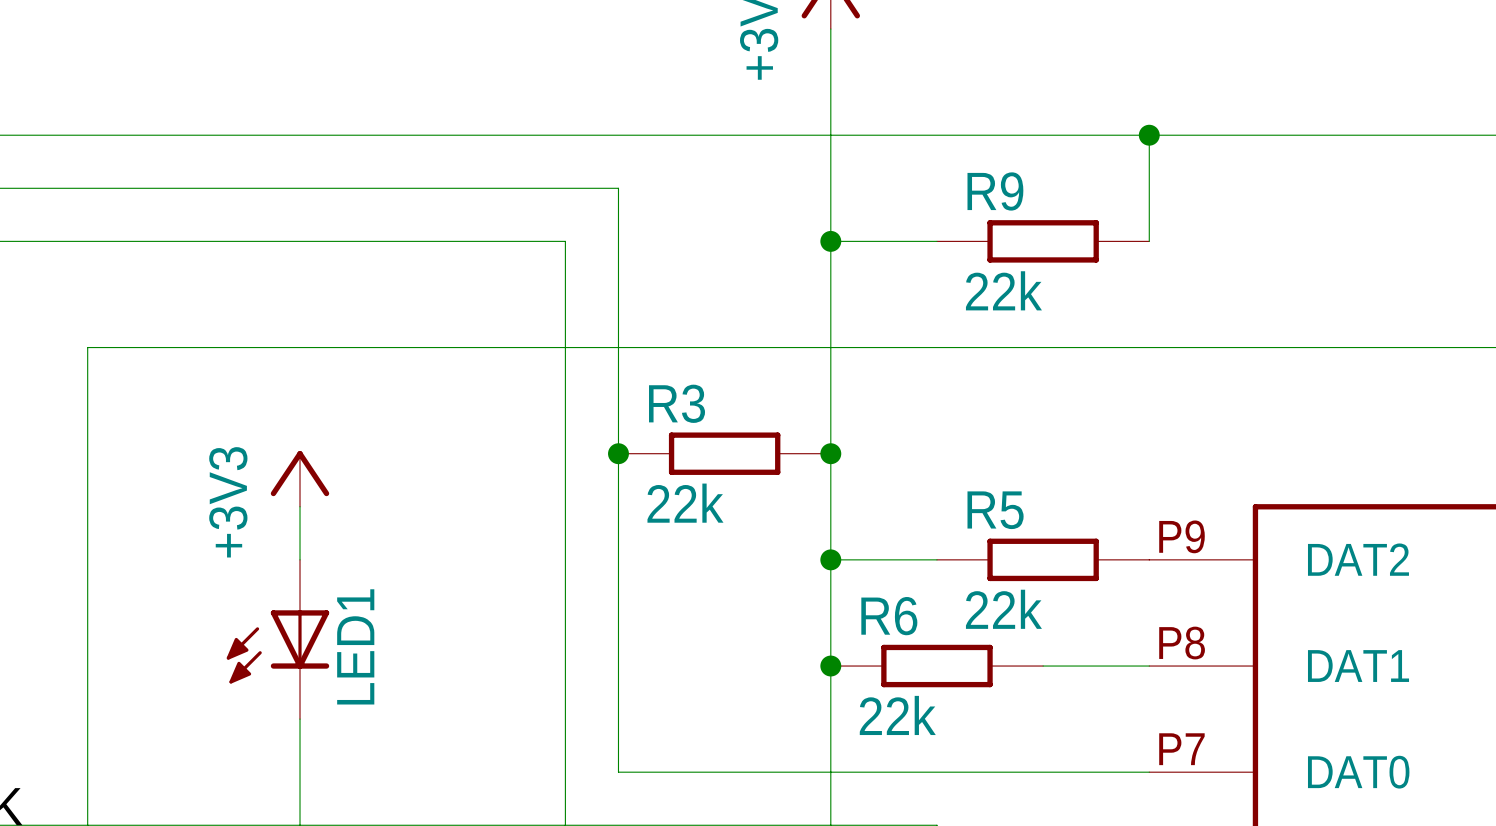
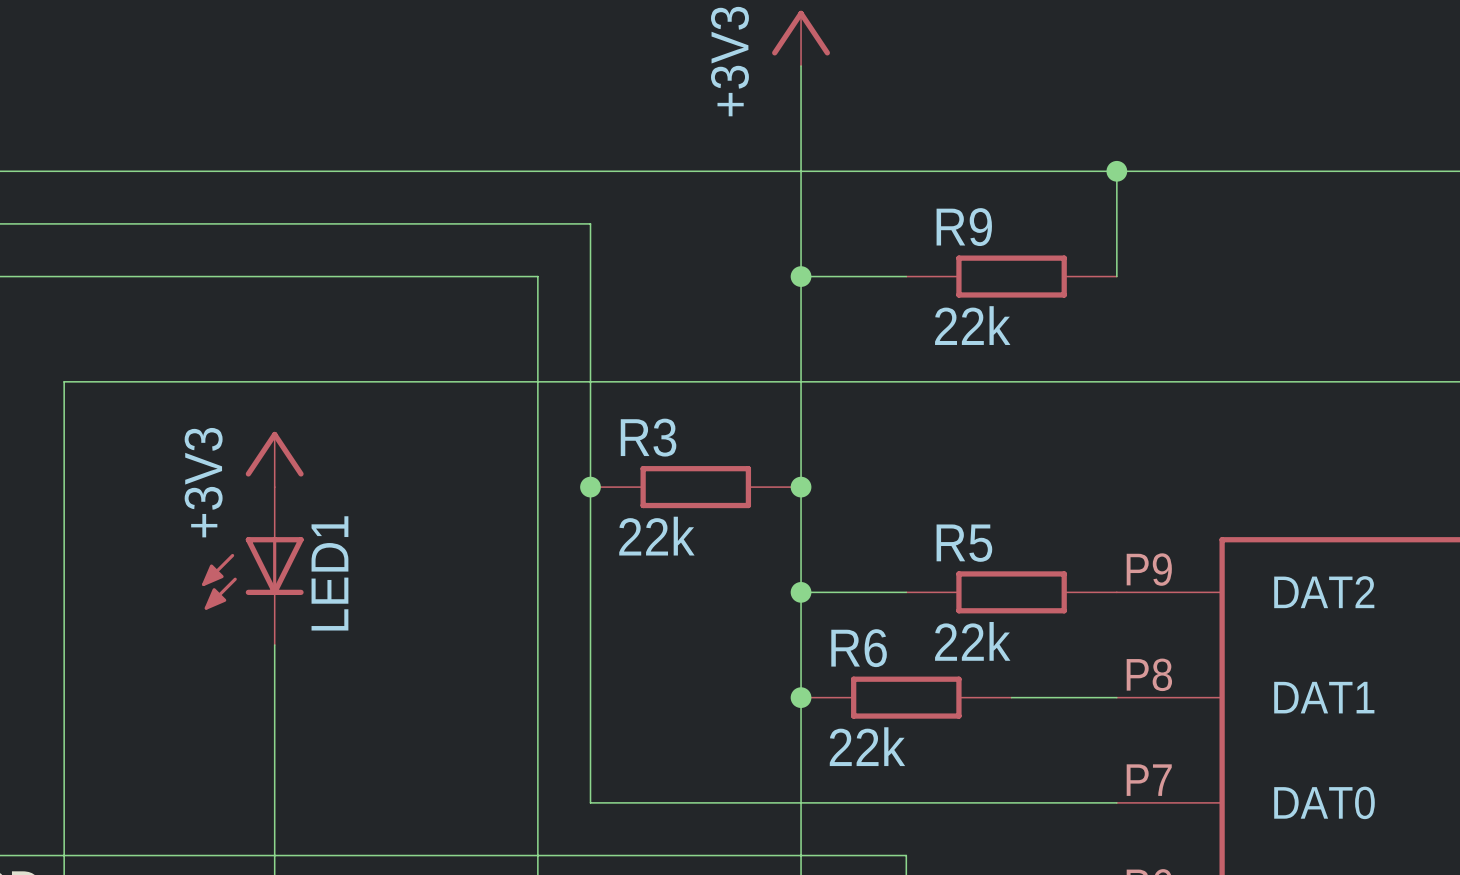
power symbol position: +3V3 (300, 478) -> +3V3 (274, 459)
LED1 position: (277, 639) -> (252, 566)

